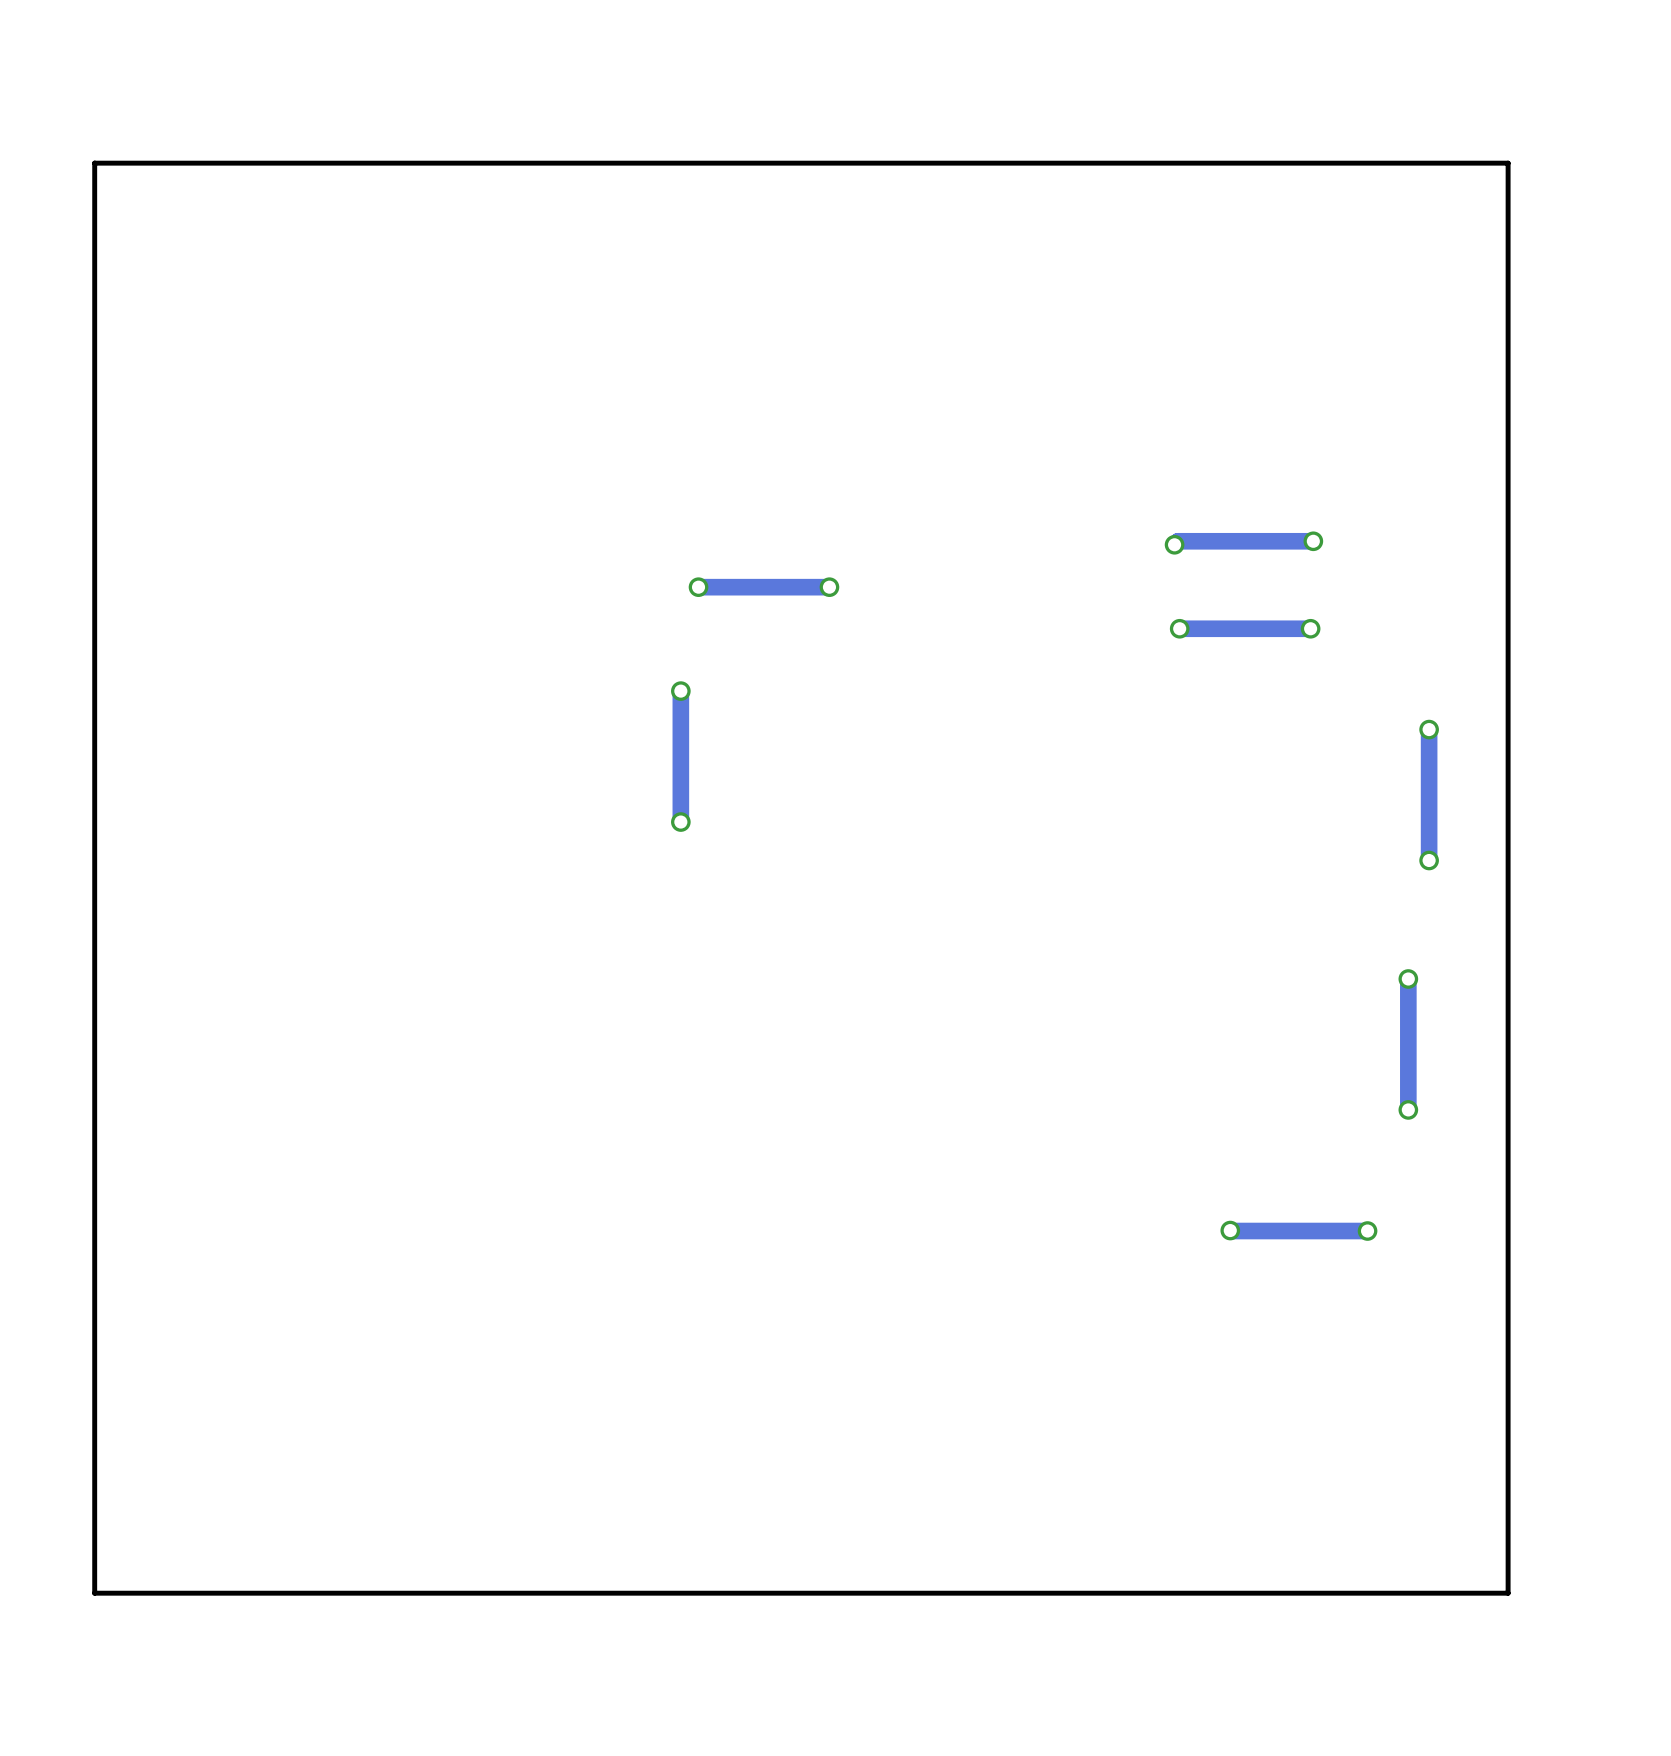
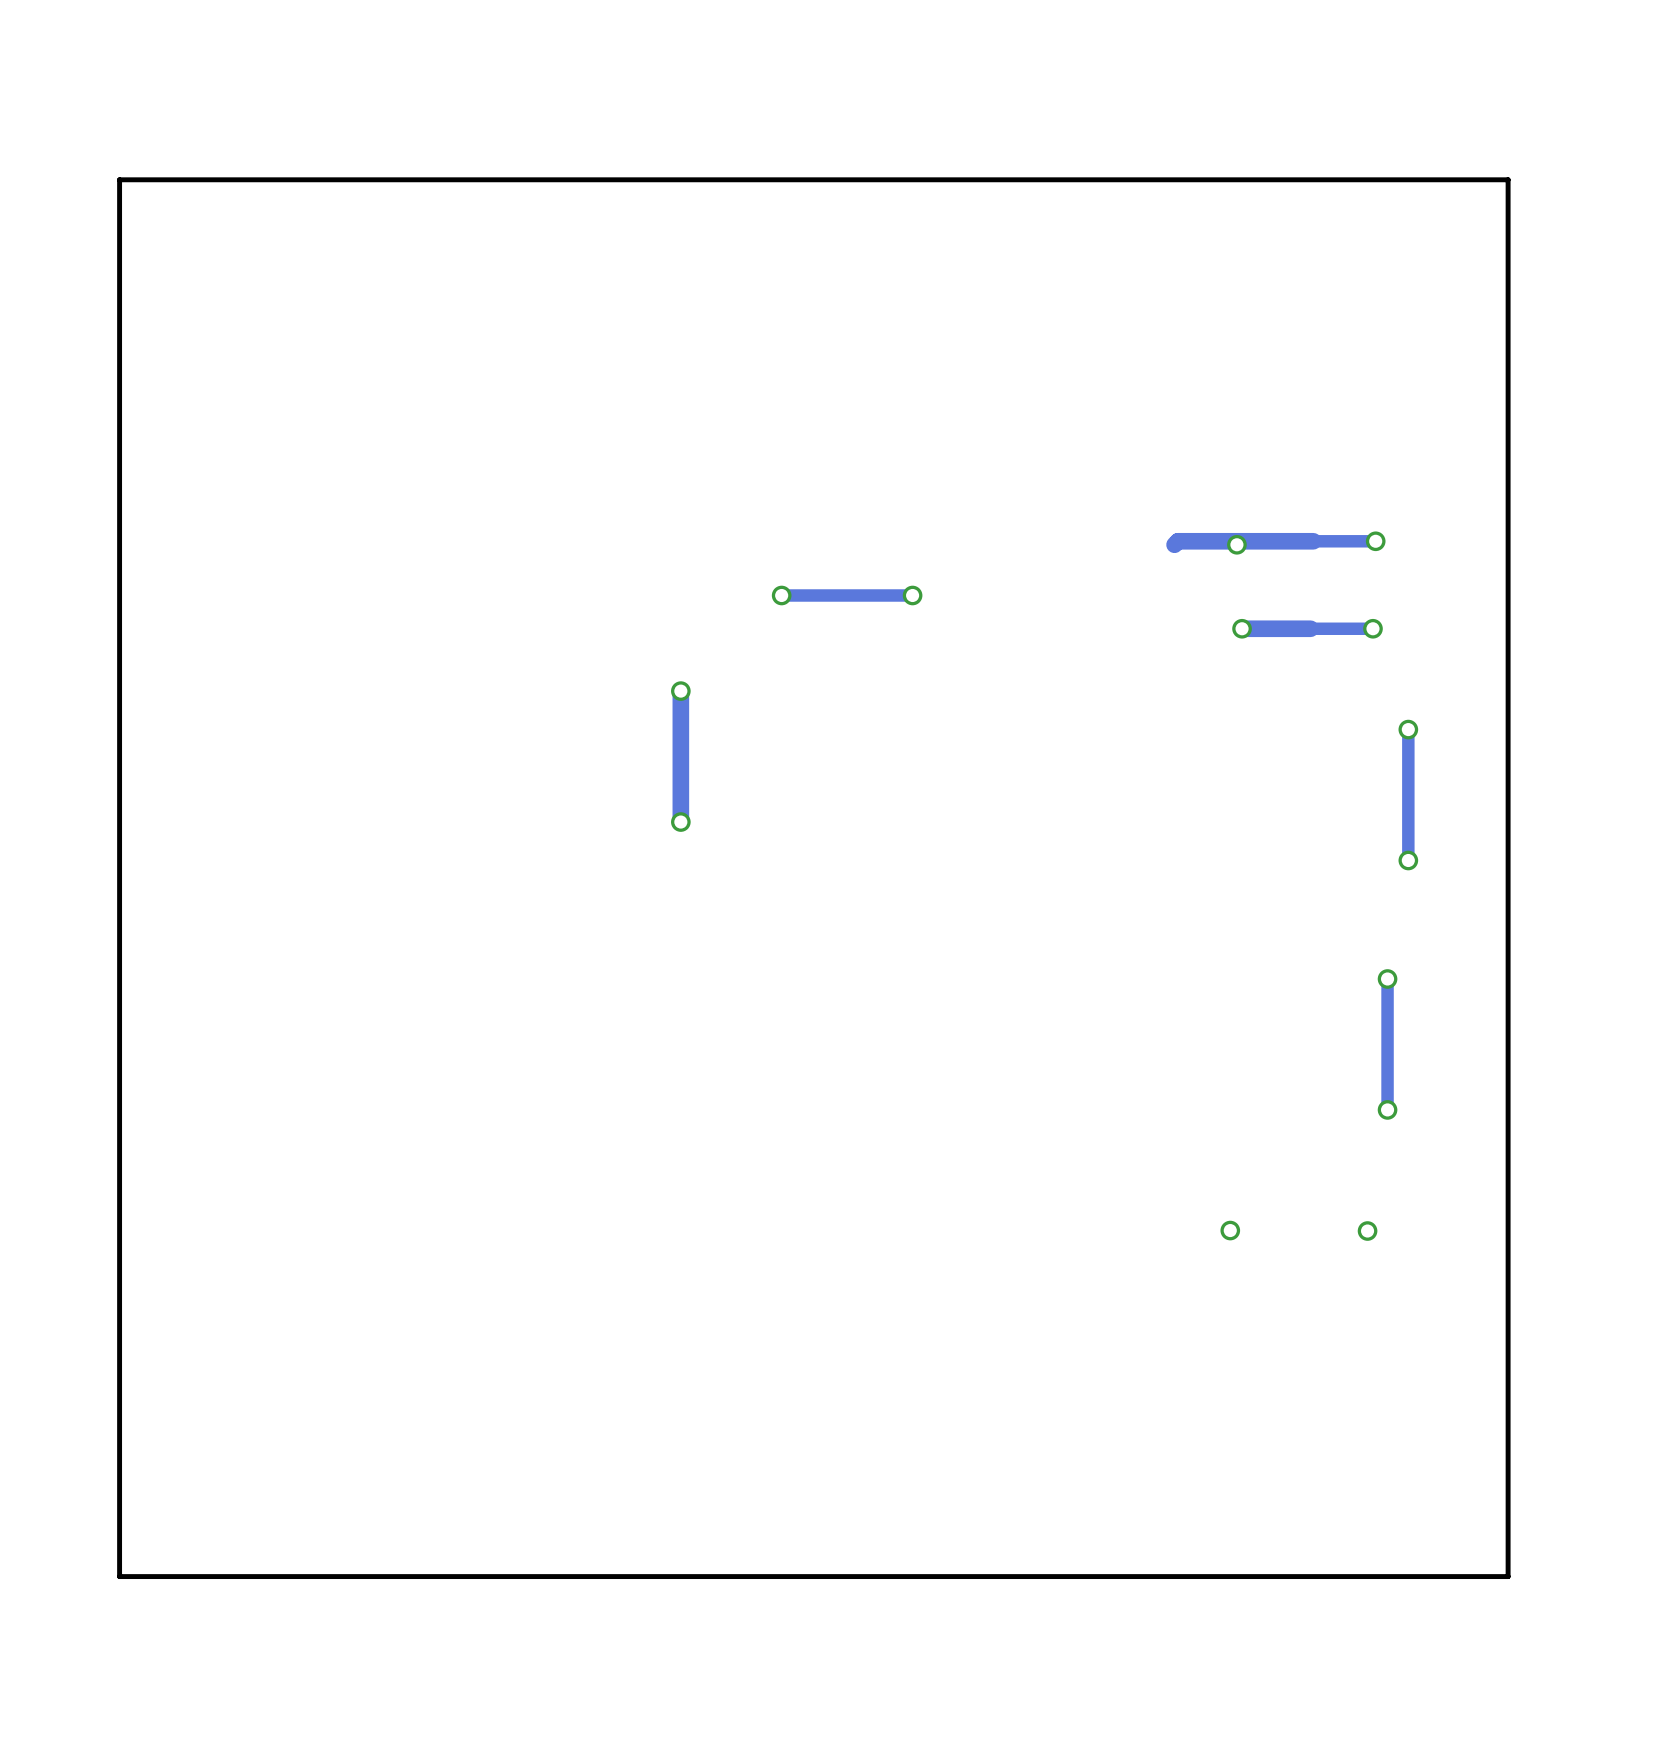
board edge: (94, 163) (94, 1593) (1508, 1593) (1508, 1576) -> (1508, 179) (119, 179) (119, 1576) (1508, 1576)
board edge: (94, 163) (1508, 163) (1508, 179) -> none
via: (1313, 541) -> none
track: none -> (1375, 541) (1313, 541)
via: none -> (1375, 541)
via: (1174, 544) -> none
via: none -> (1236, 544)
via: (698, 587) -> none
track: (829, 587) (698, 587) -> (912, 595) (781, 595)
via: (829, 587) -> none
via: none -> (781, 595)
via: none -> (912, 595)
via: (1179, 628) -> none
track: (1242, 628) (1179, 628) -> (1372, 628) (1310, 628)
via: none -> (1242, 628)
via: (1310, 628) -> none
via: none -> (1372, 628)
track: (1429, 729) (1429, 860) -> (1408, 729) (1408, 860)
via position: (1429, 729) -> (1408, 729)
via position: (1429, 860) -> (1408, 860)
track: (1408, 979) (1408, 1109) -> (1387, 979) (1387, 1109)
via position: (1408, 979) -> (1387, 979)
via position: (1408, 1109) -> (1387, 1109)
track: (1230, 1230) (1367, 1231) -> none

